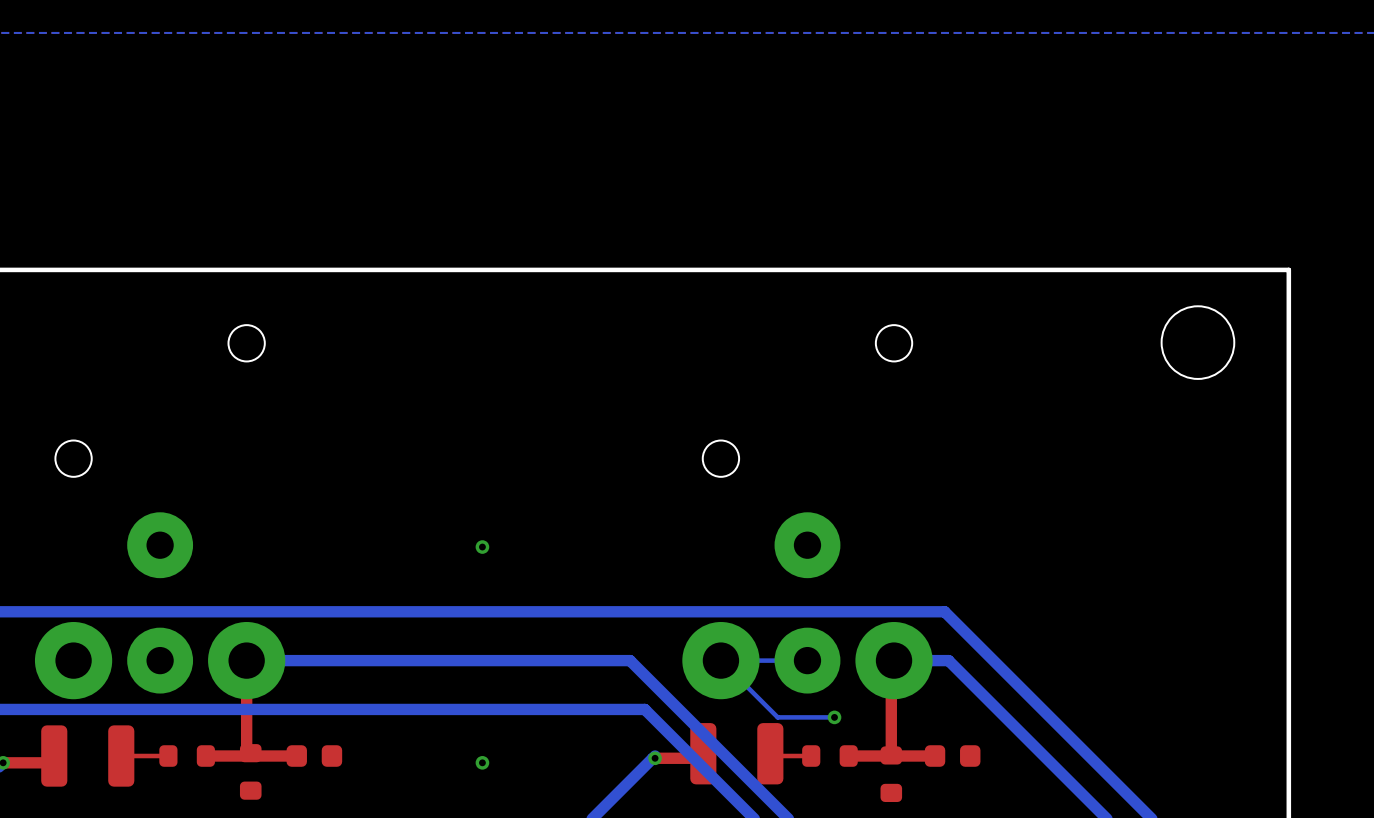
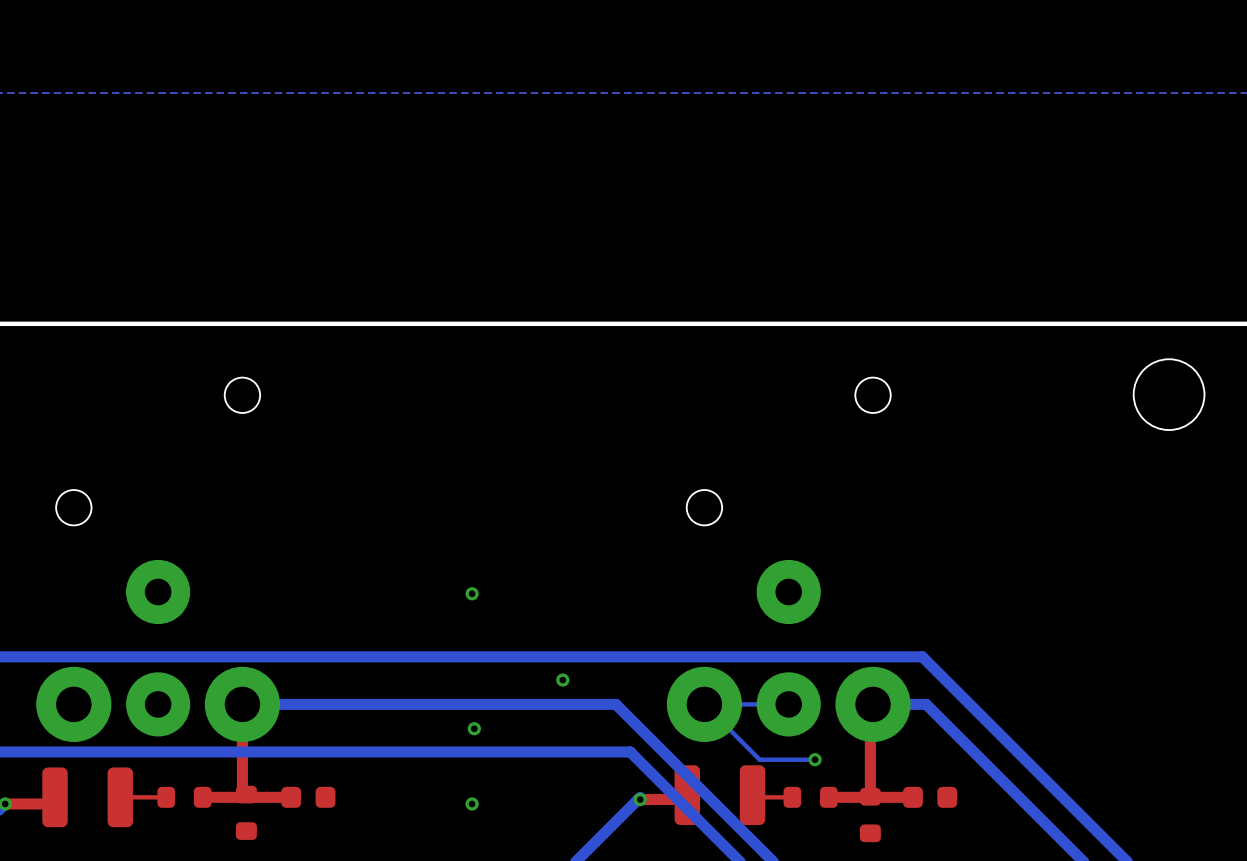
via: none -> (562, 680)
via: none -> (474, 728)

